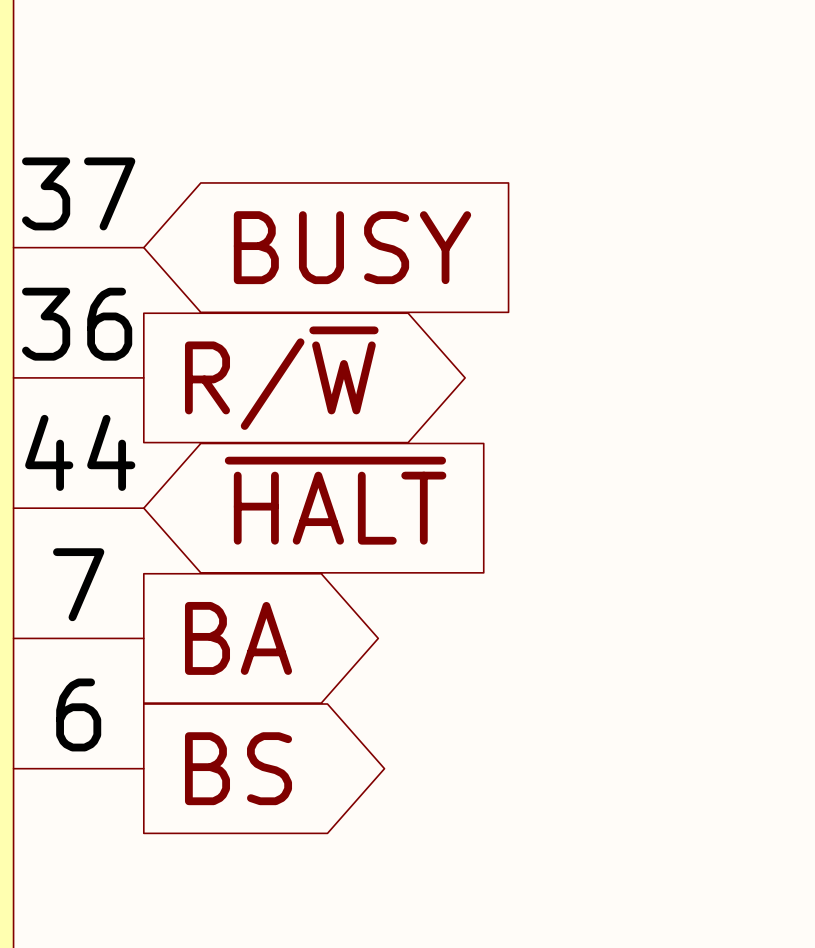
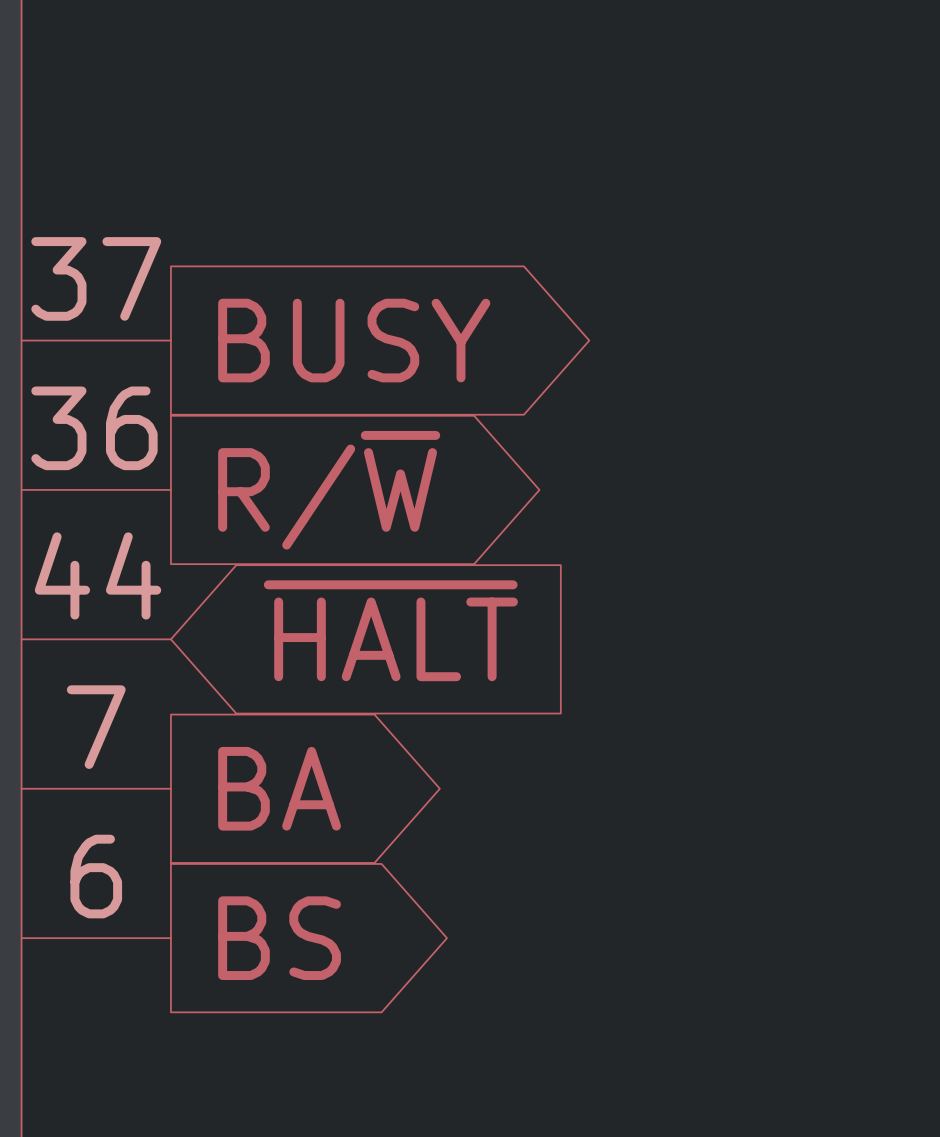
global label shape: input (352, 247) -> output (354, 340)

